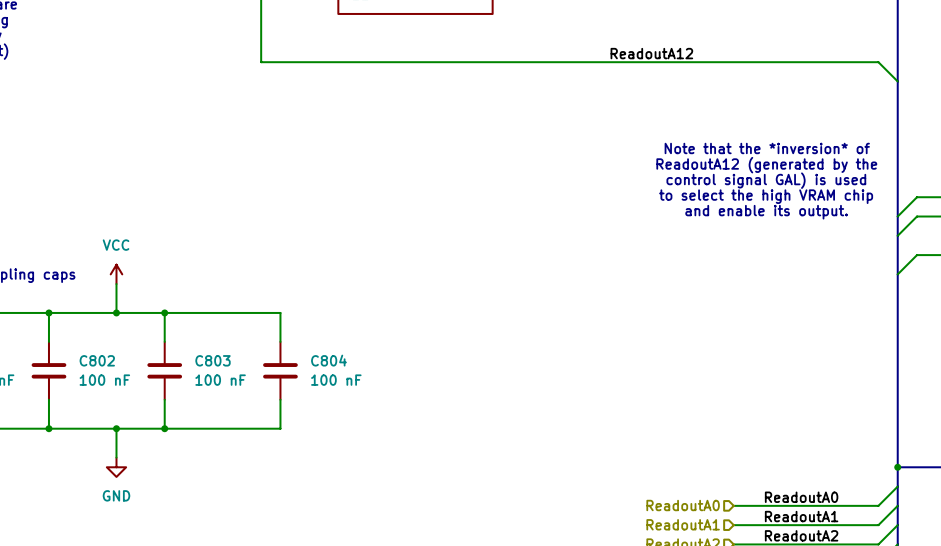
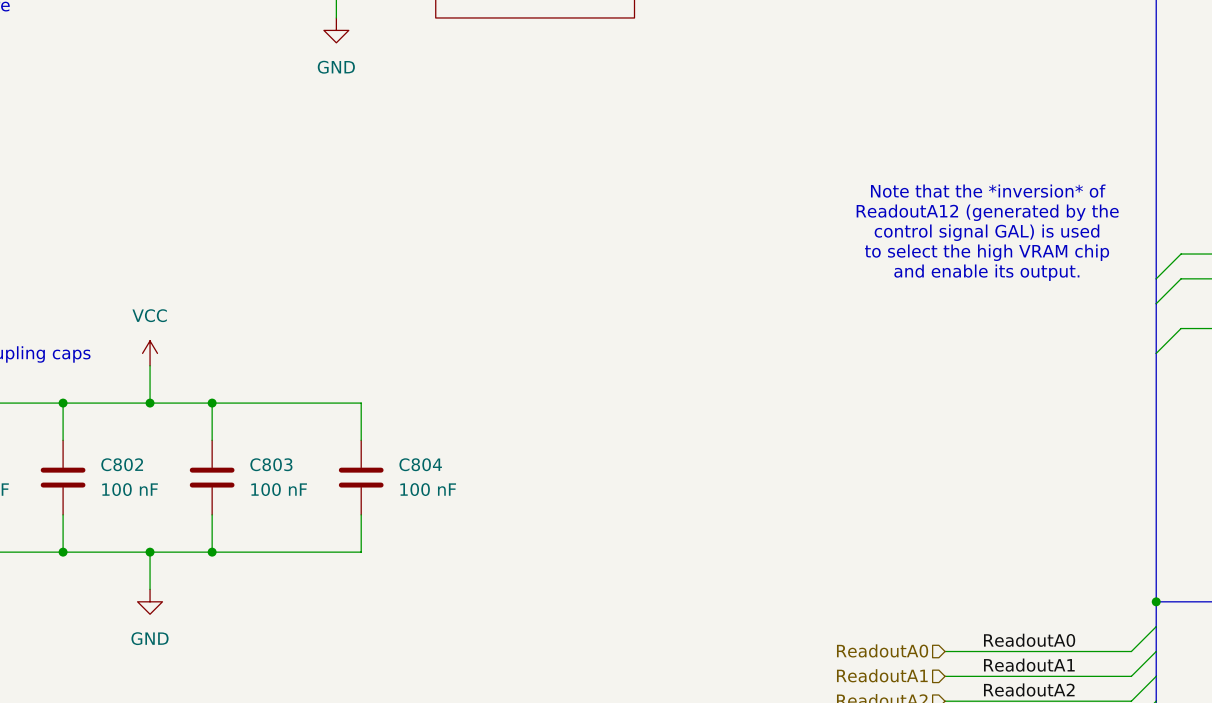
wire: (261, 13) (261, 62) (878, 62) (897, 81) -> none
power symbol: none -> GND (336, 30)
label: ReadoutA12 (651, 53) -> none

